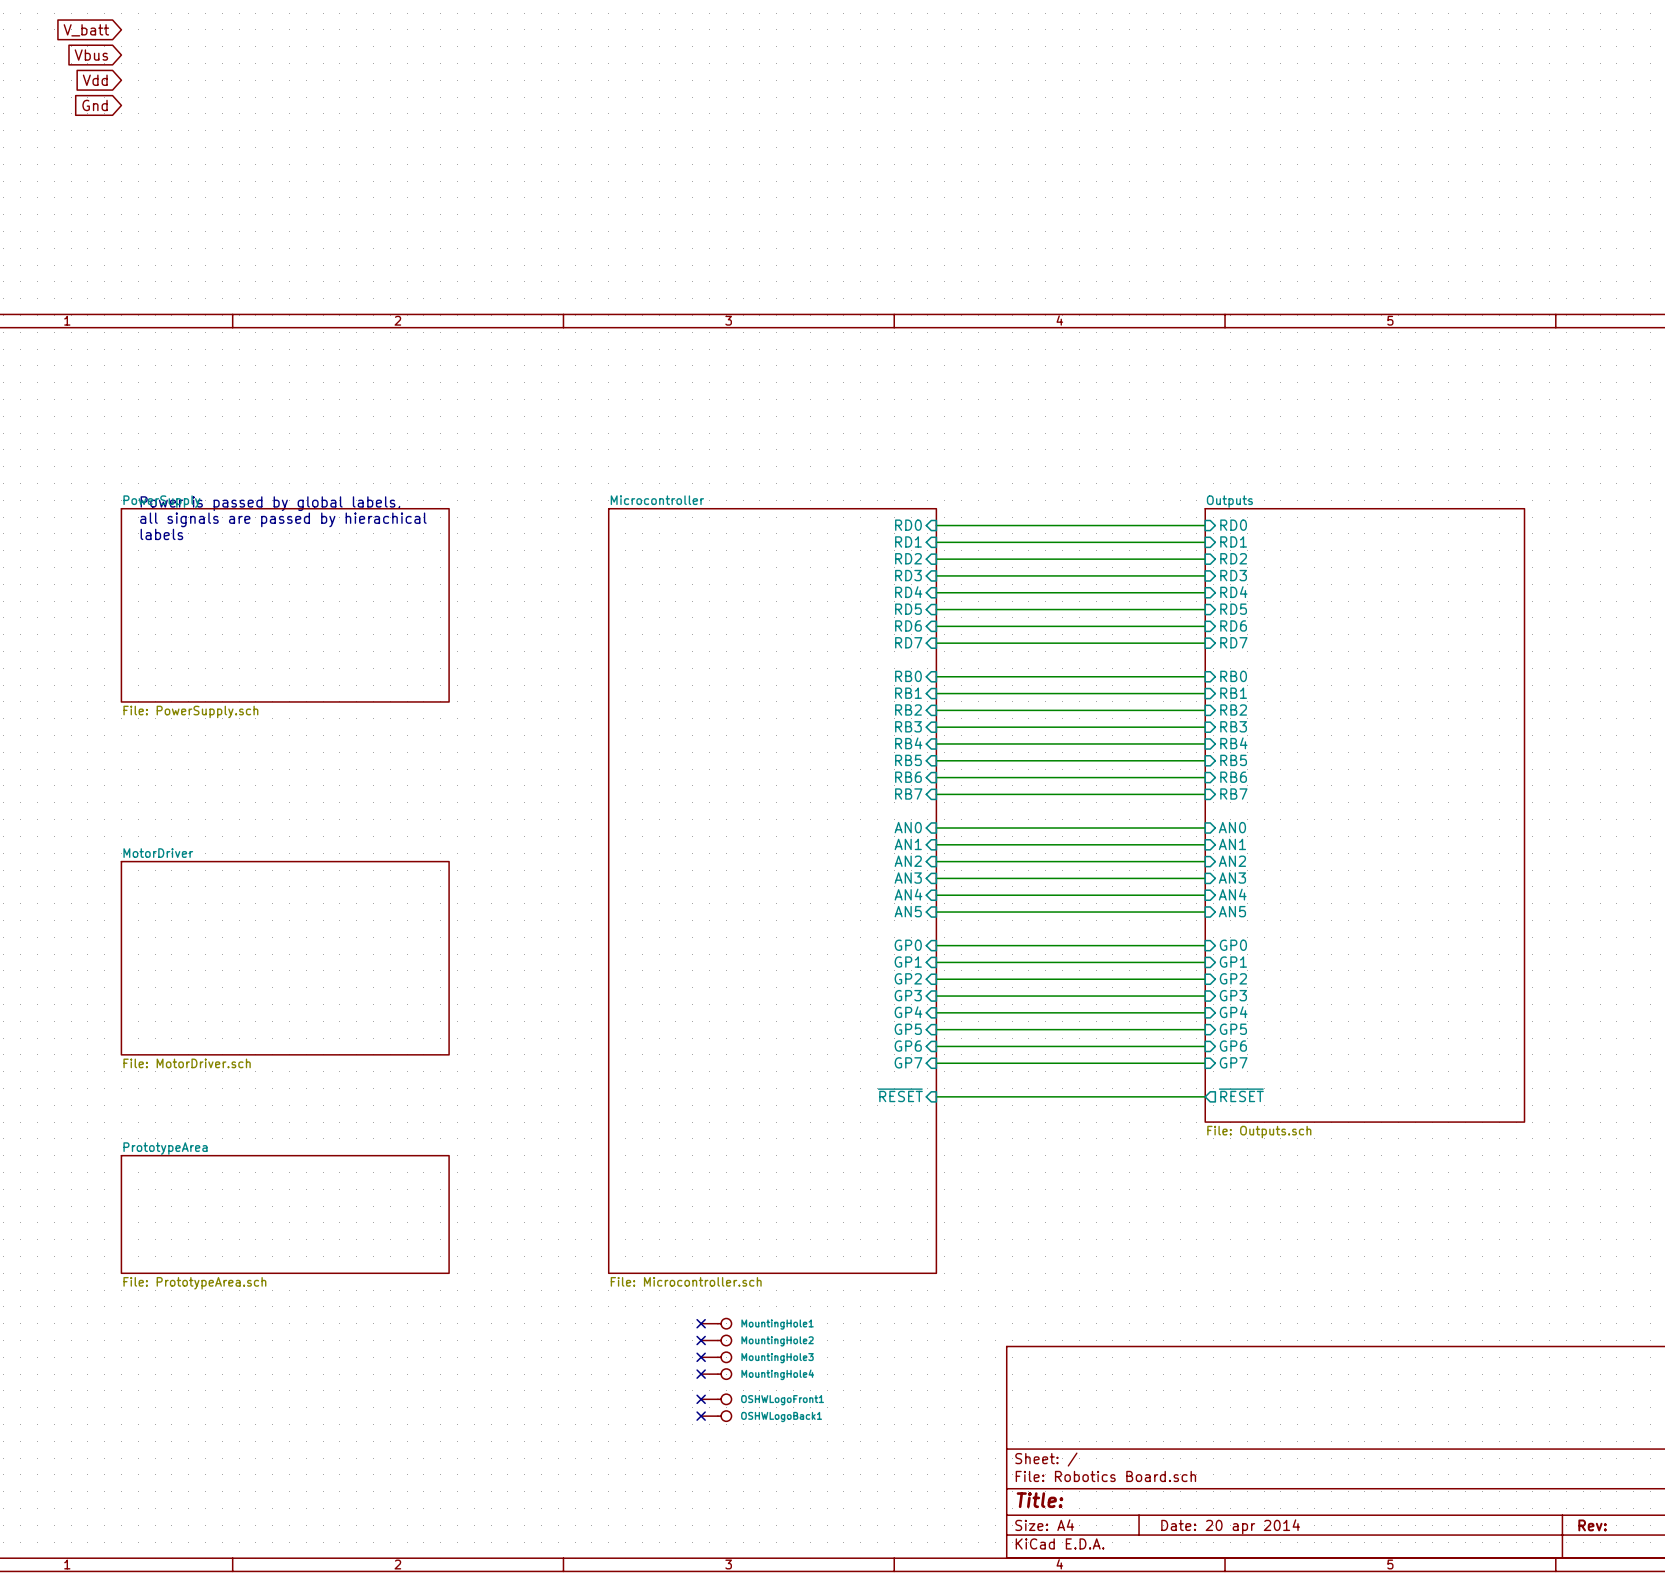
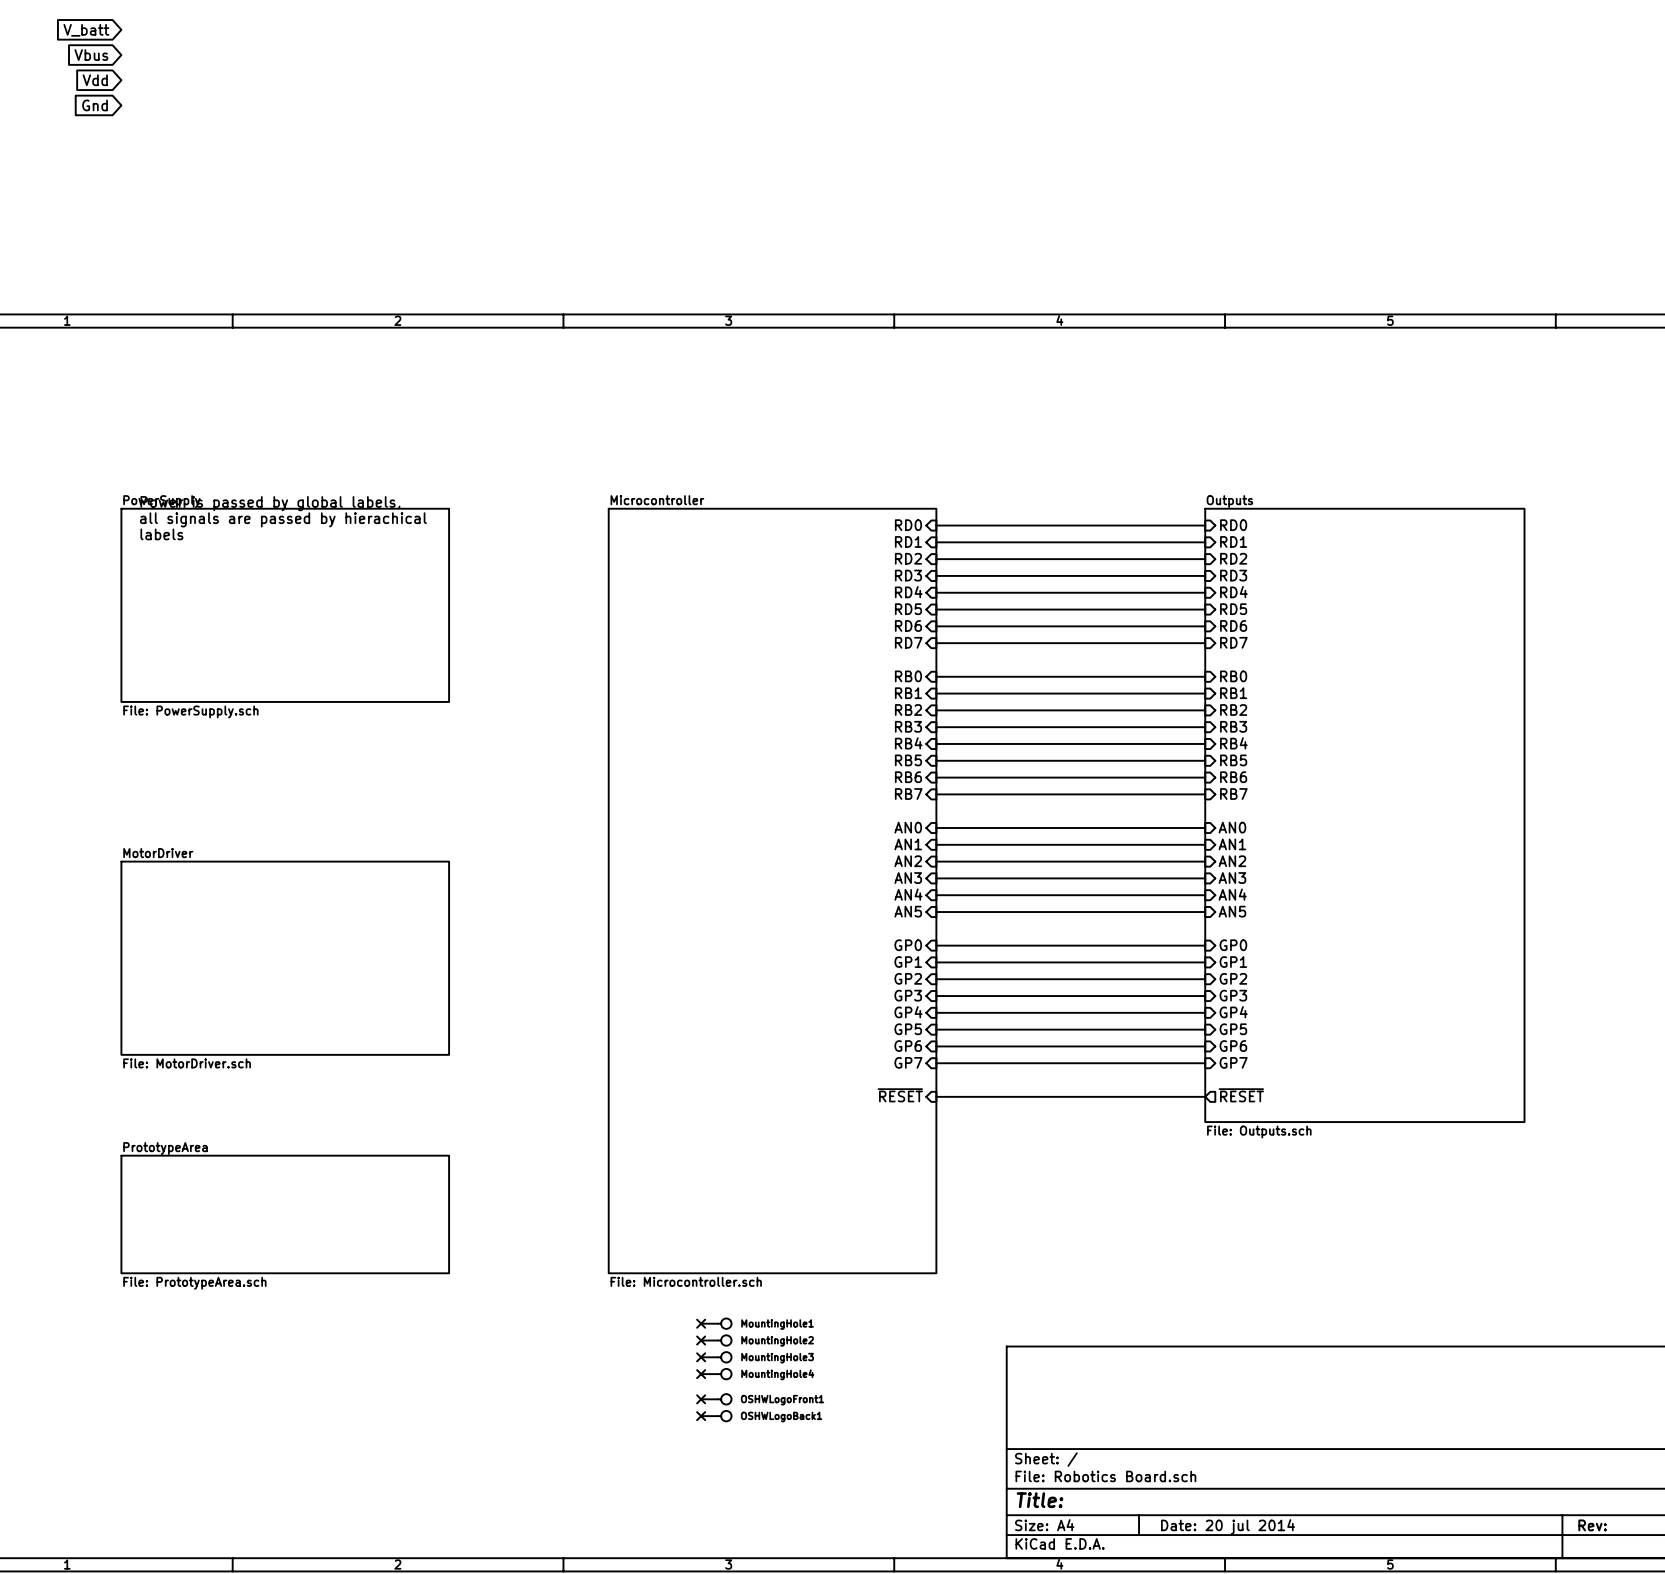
title block: Date: 20 apr 2014 (1230, 1526) -> Date: 20 jul 2014 (1228, 1526)

